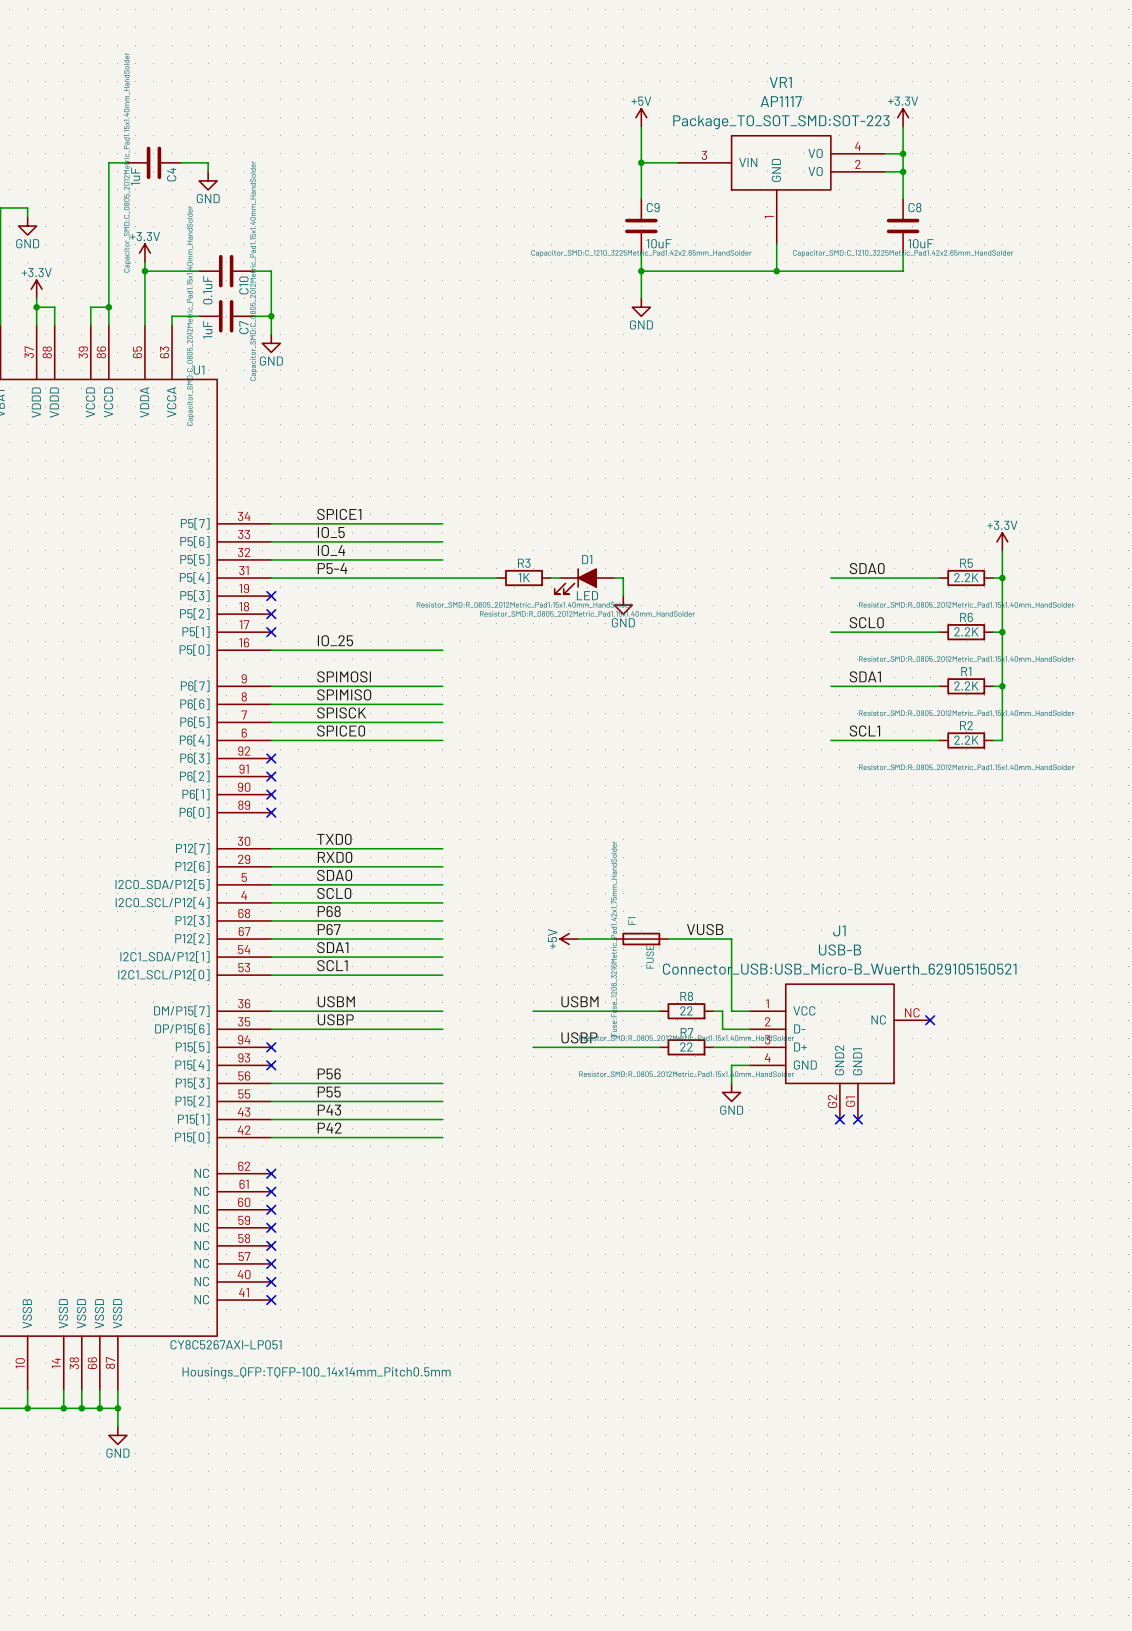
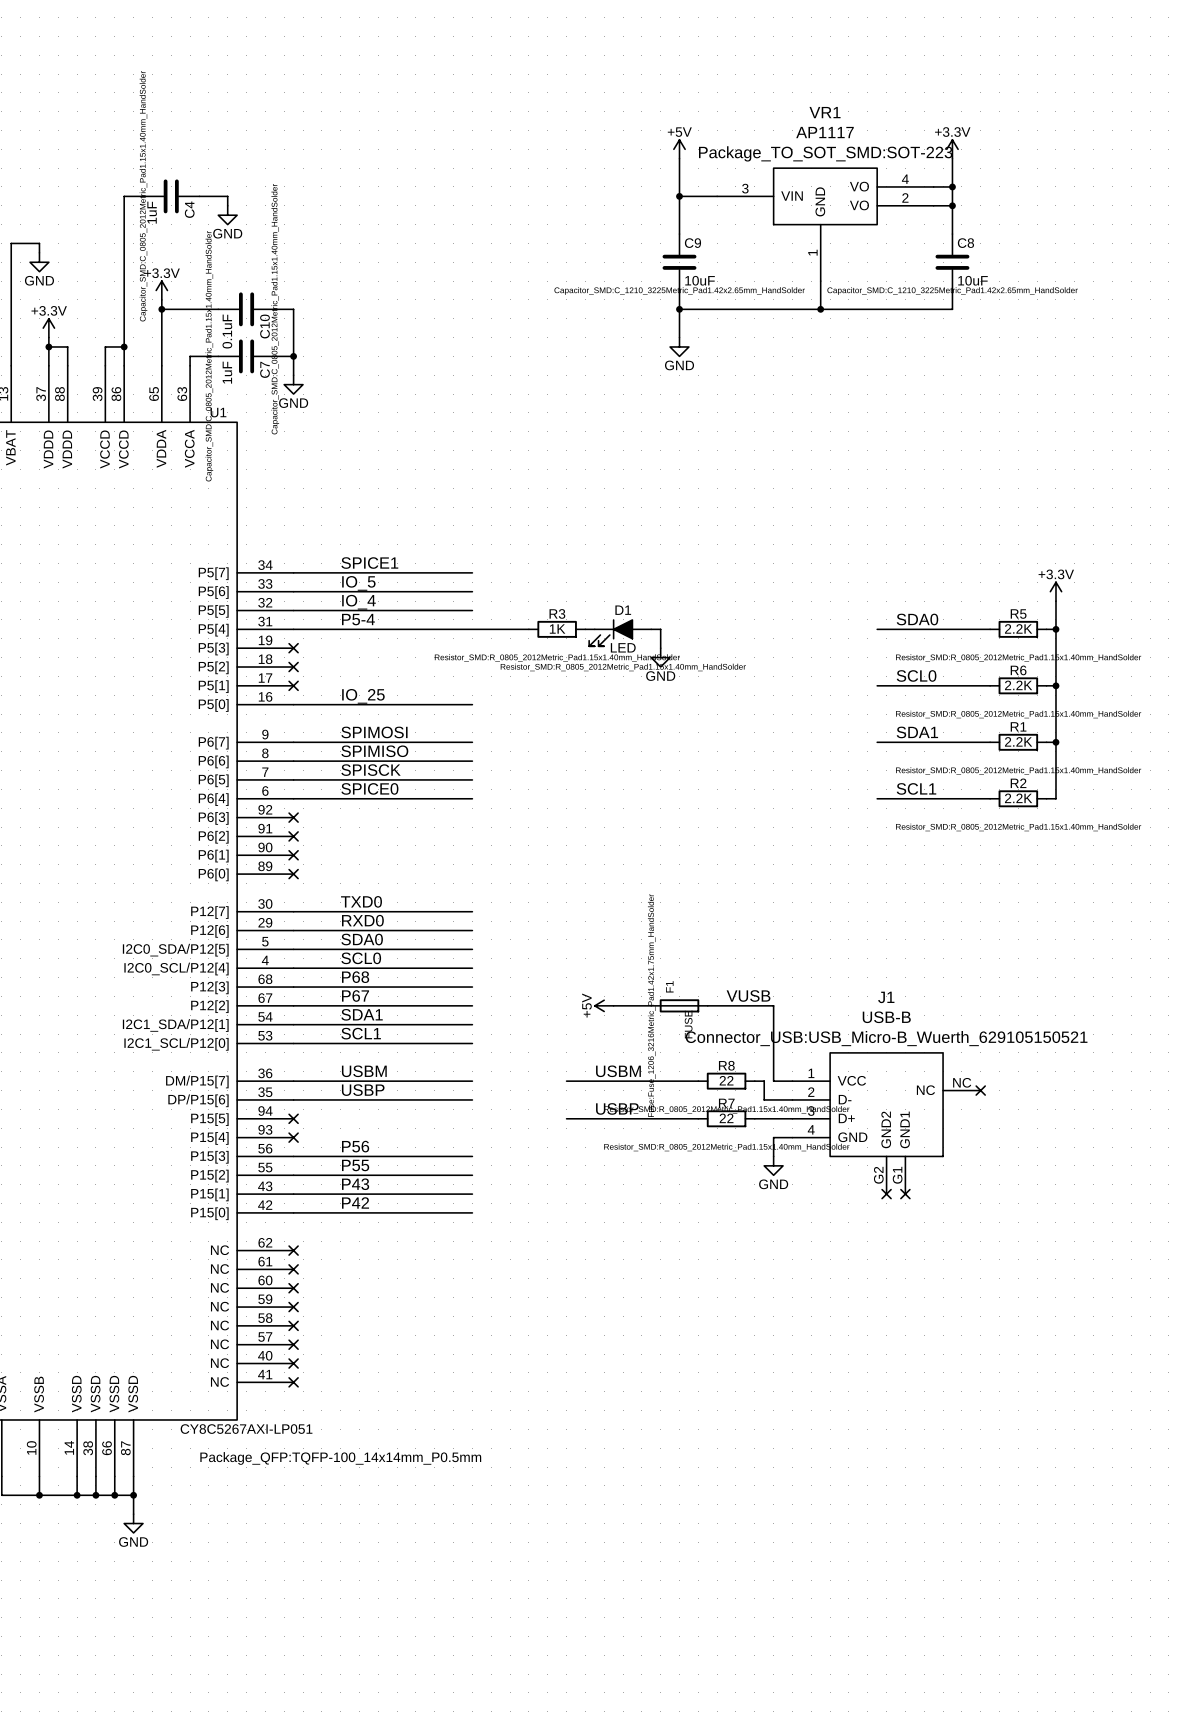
U1 text: Housings_QFP:TQFP-100_14x14mm_Pitch0.5mm (316, 1373) -> Package_QFP:TQFP-100_14x14mm_P0.5mm (340, 1458)

